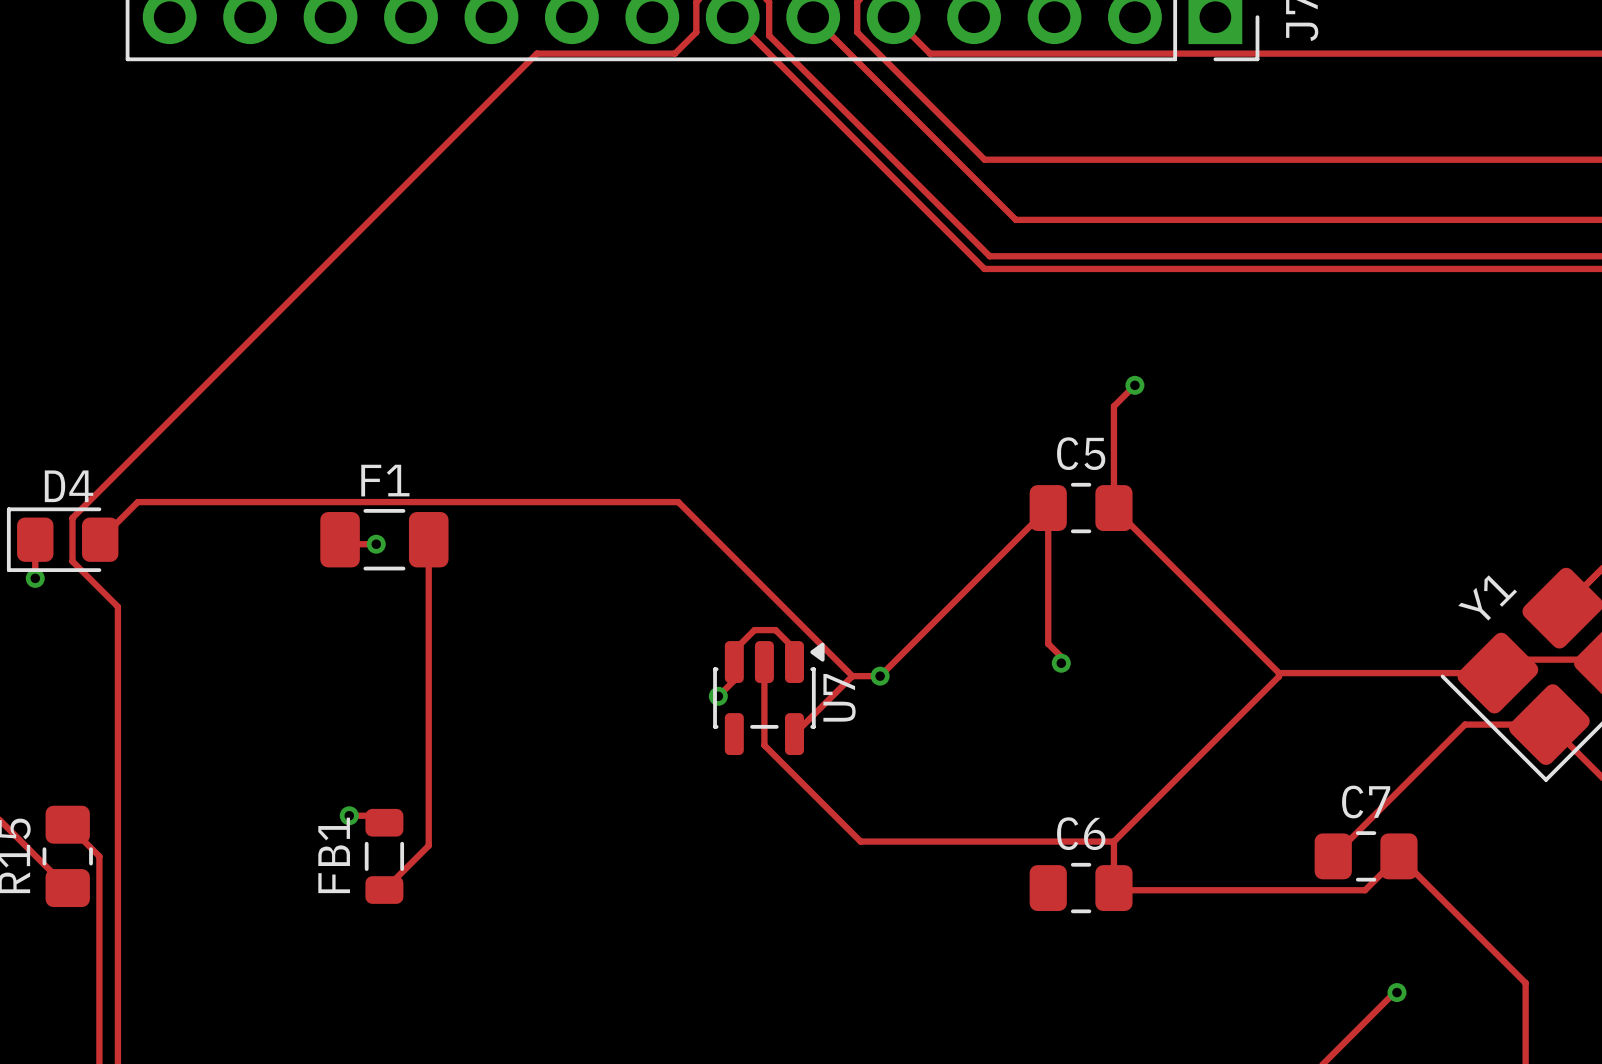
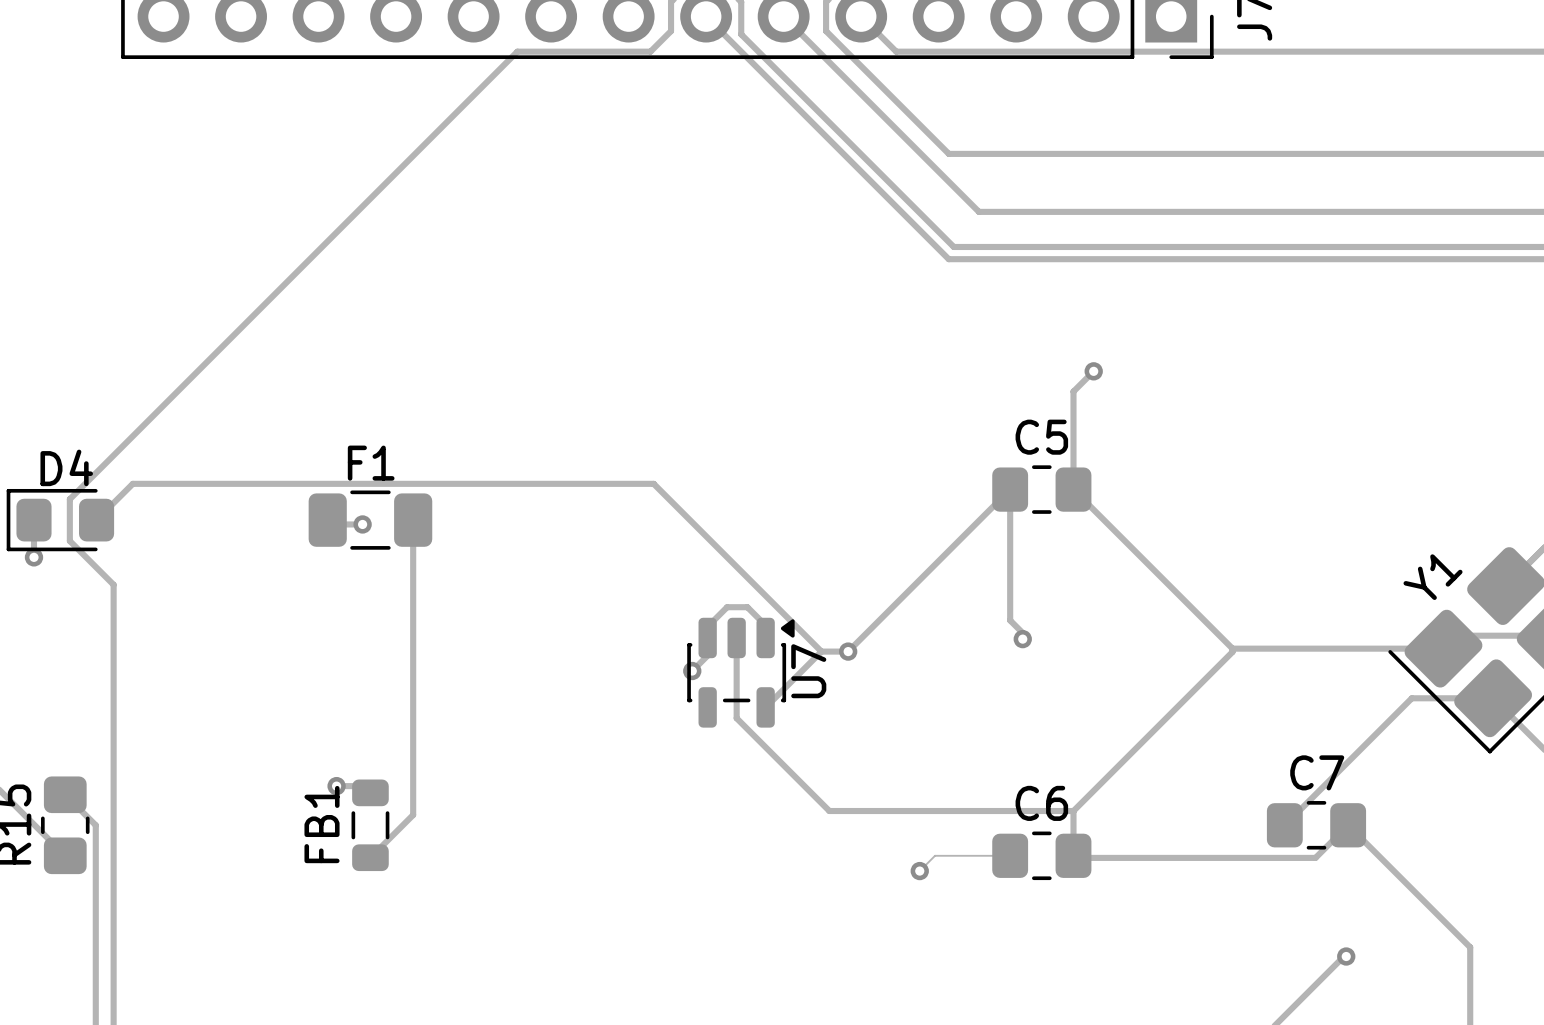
track: none -> (1010, 855) (935, 855) (919, 871)
via: none -> (919, 871)

